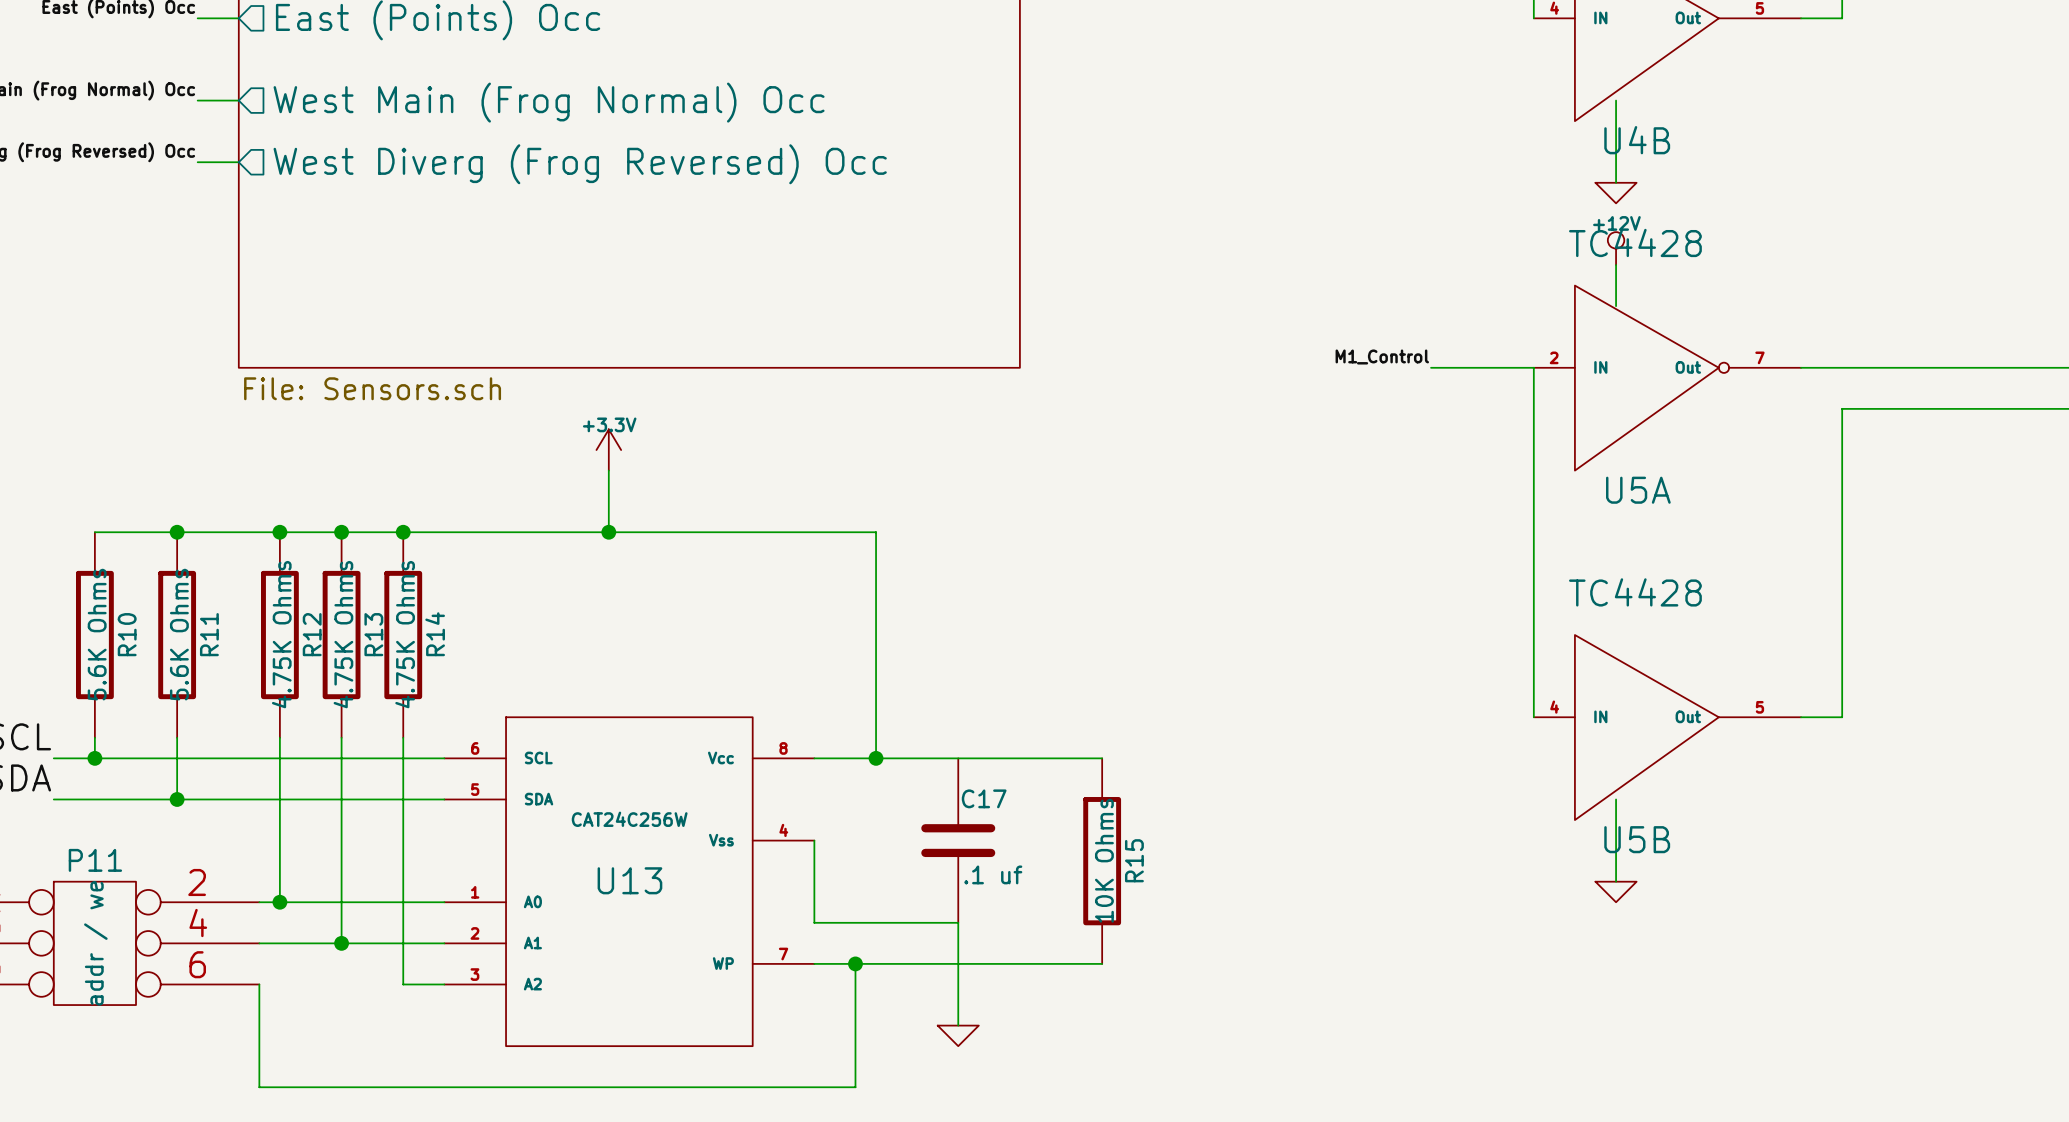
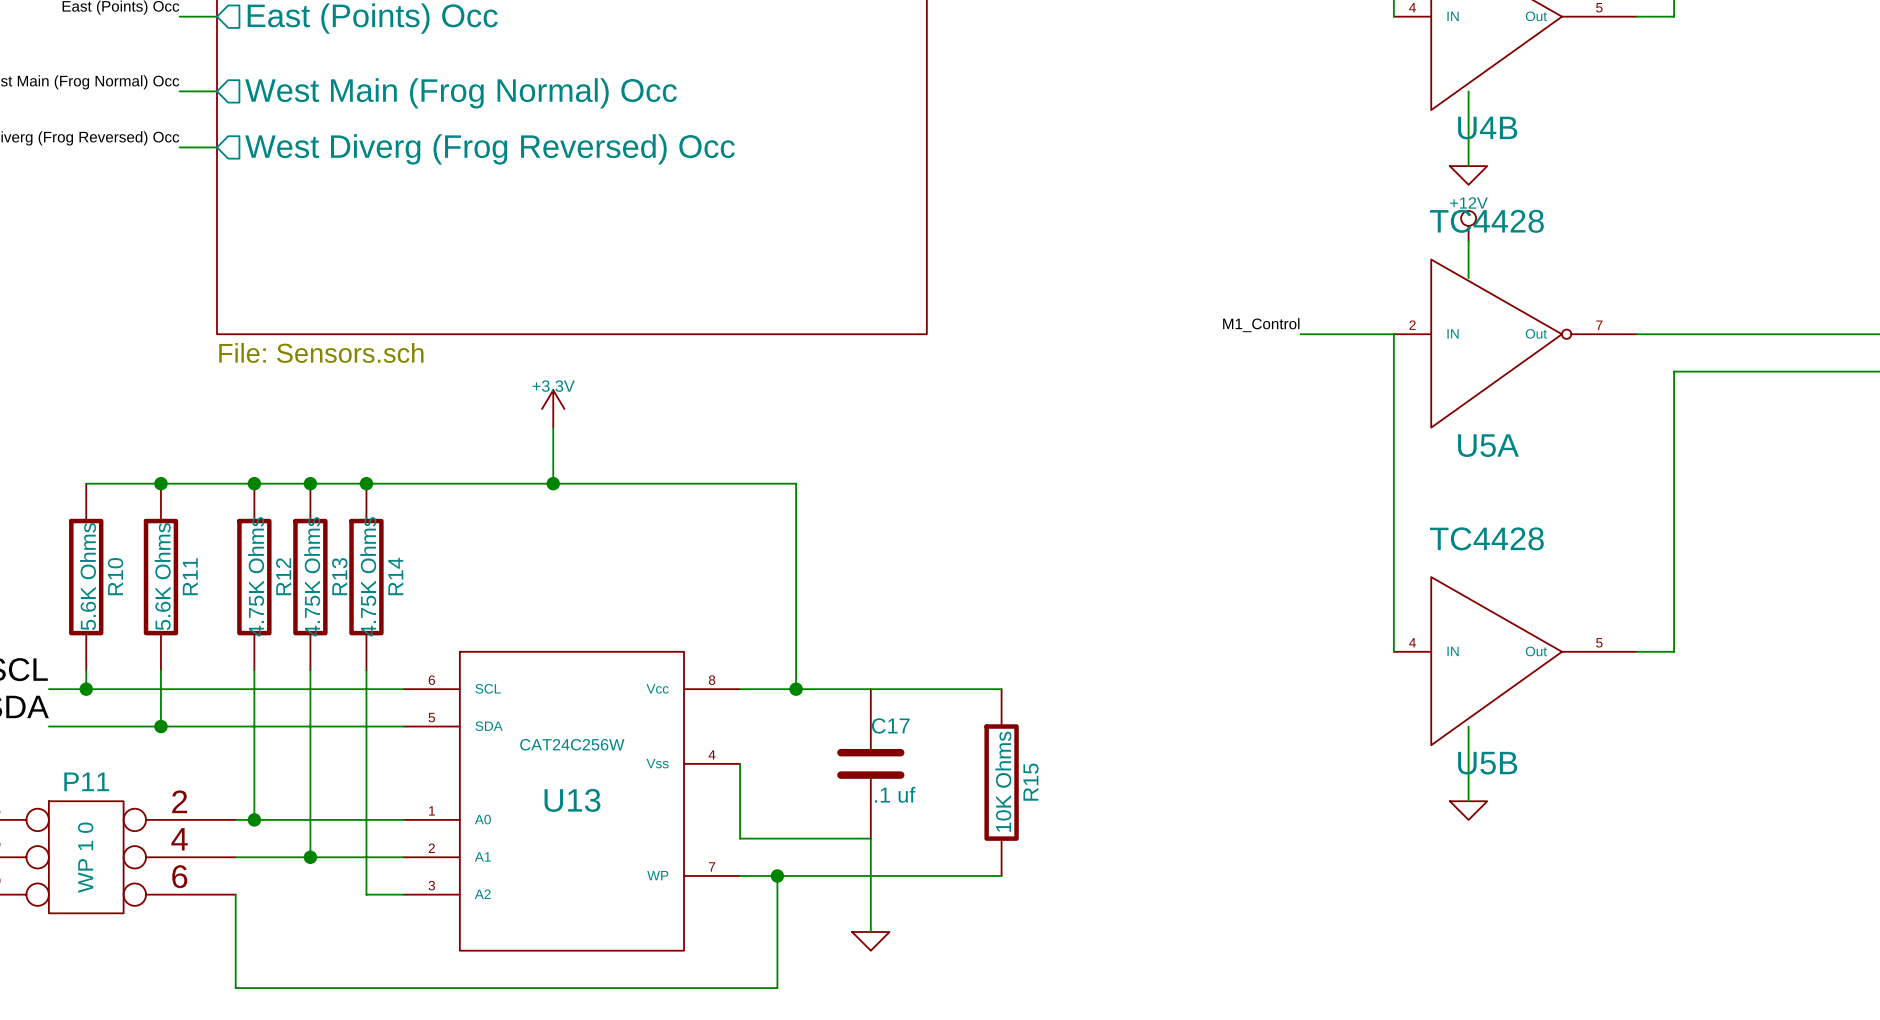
P11 value: addr / we (95, 943) -> WP 1 0 (85, 857)

